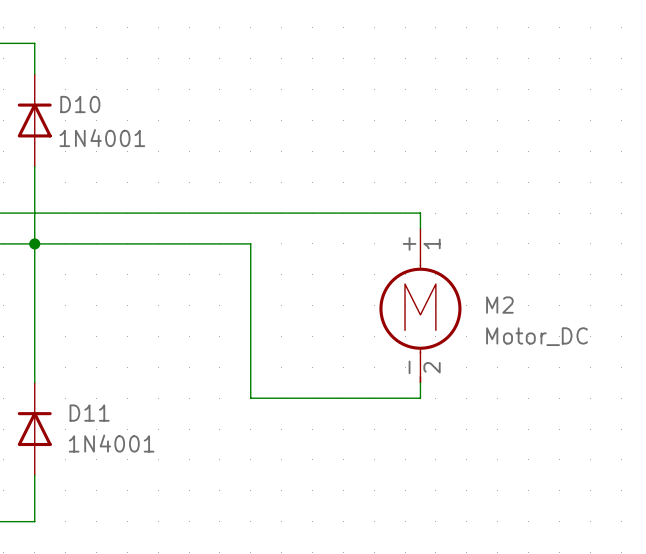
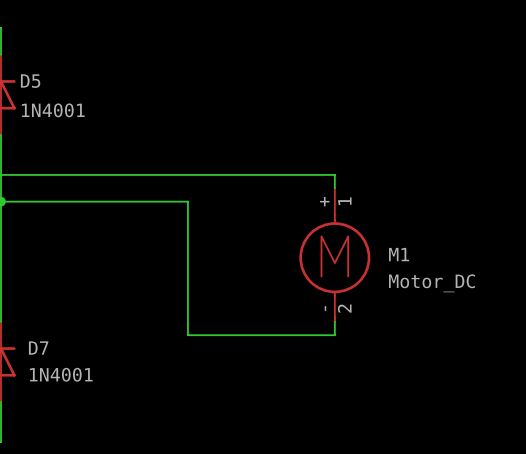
D10 name: D10 (80, 104) -> D5 (30, 81)
M2 name: M2 (499, 305) -> M1 (399, 254)
D11 name: D11 (89, 413) -> D7 (38, 348)

